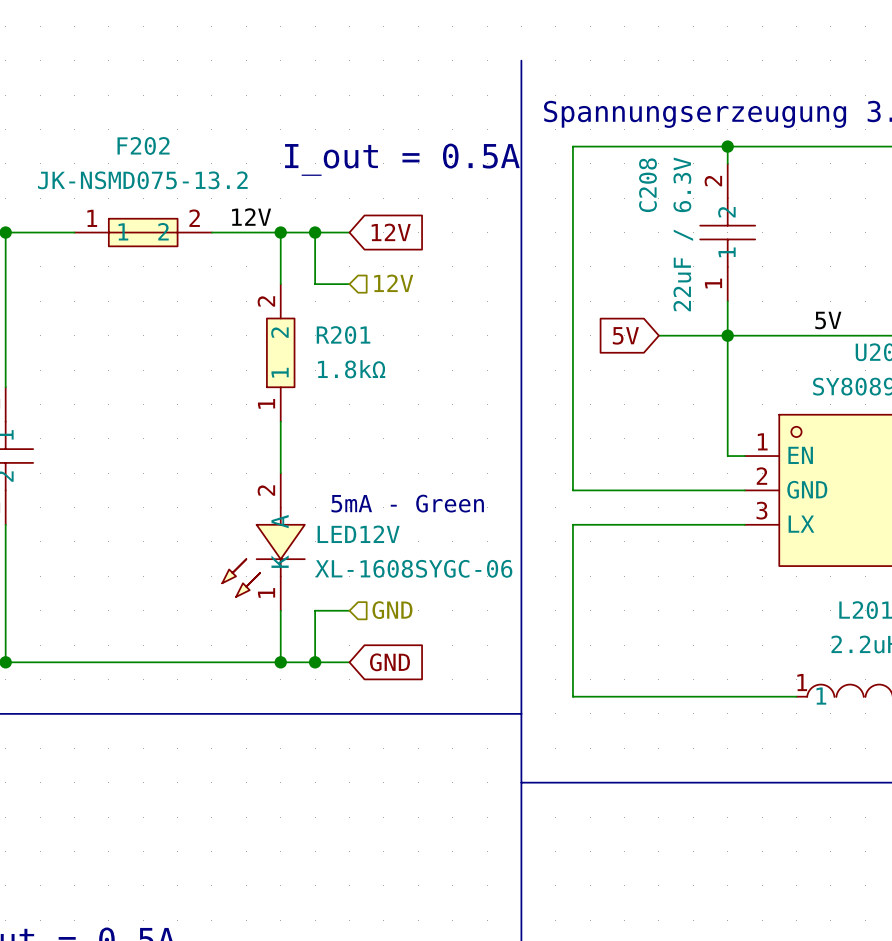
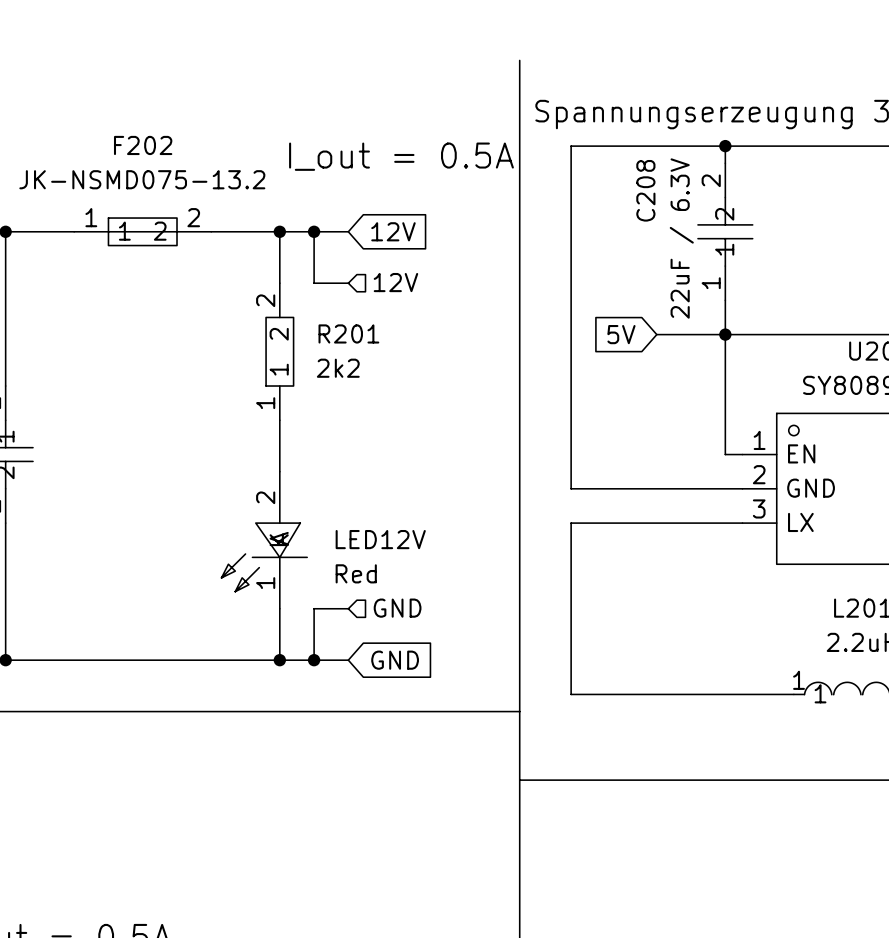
label: 12V (251, 217) -> none
label: 5V (828, 320) -> none
R201 value: 1.8kΩ (351, 369) -> 2k2 (338, 368)
LED12V symbol: [222, 473, 305, 611] -> [221, 471, 308, 609]
text: 5mA - Green (407, 503) -> none
LED12V value: XL-1608SYGC-06 (413, 568) -> Red (356, 573)

